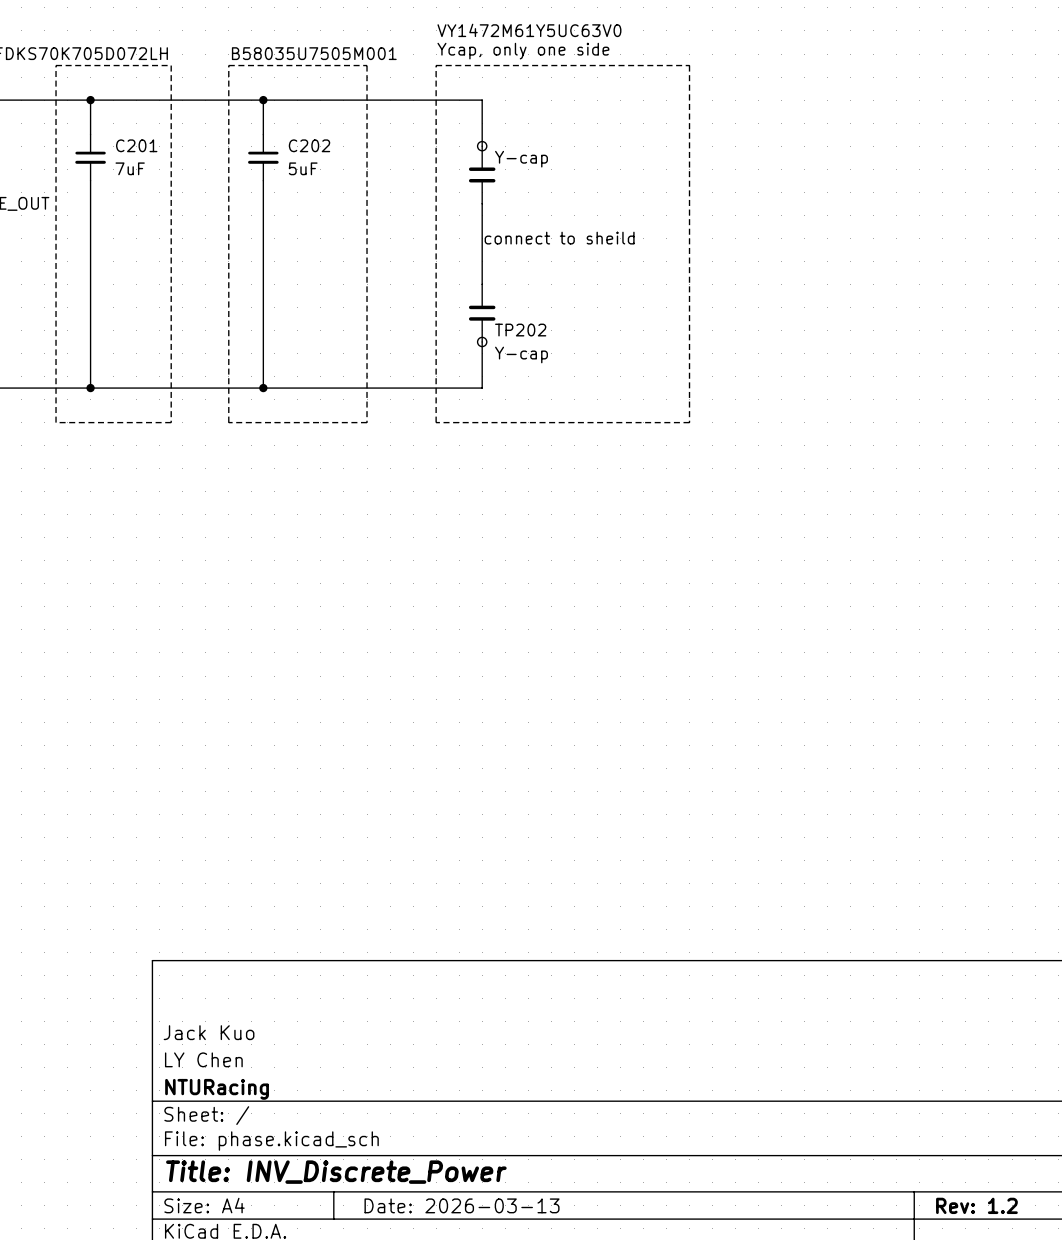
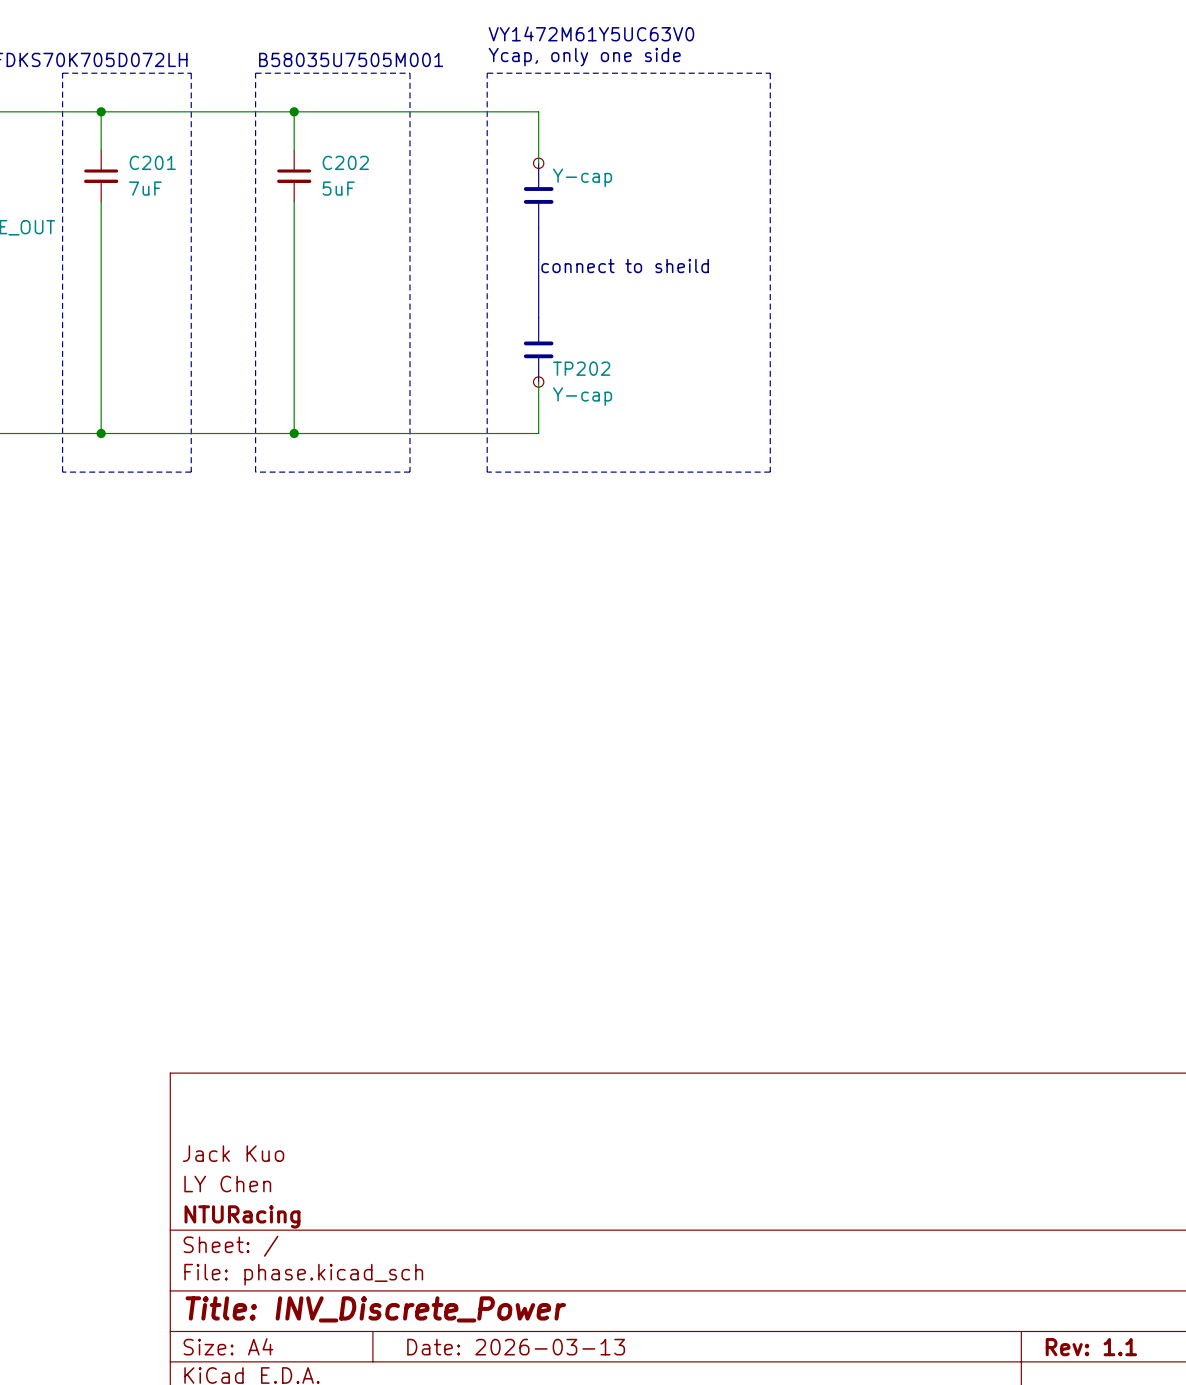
title block: Rev: 1.2 (976, 1205) -> Rev: 1.1 (1091, 1347)

